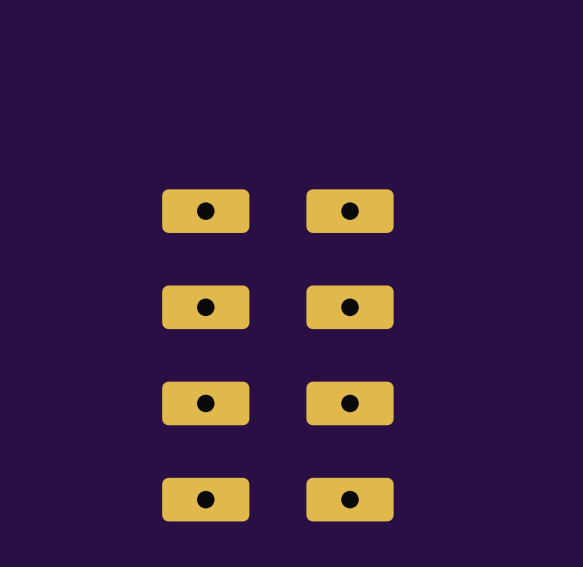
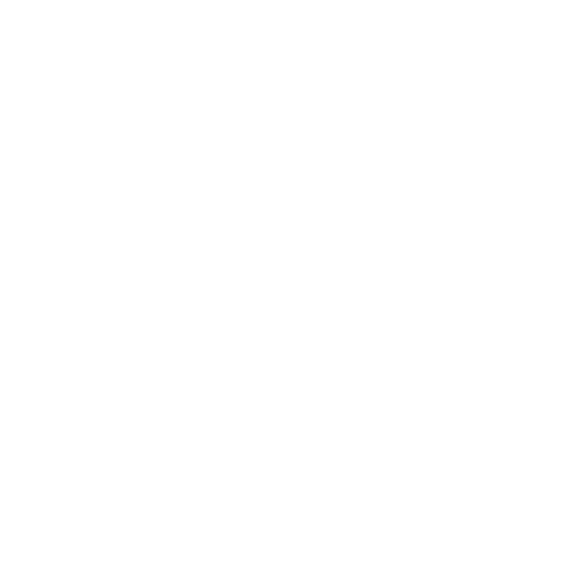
part: (277, 211) -> none
part: (277, 307) -> none
part: (277, 403) -> none
part: (277, 499) -> none

